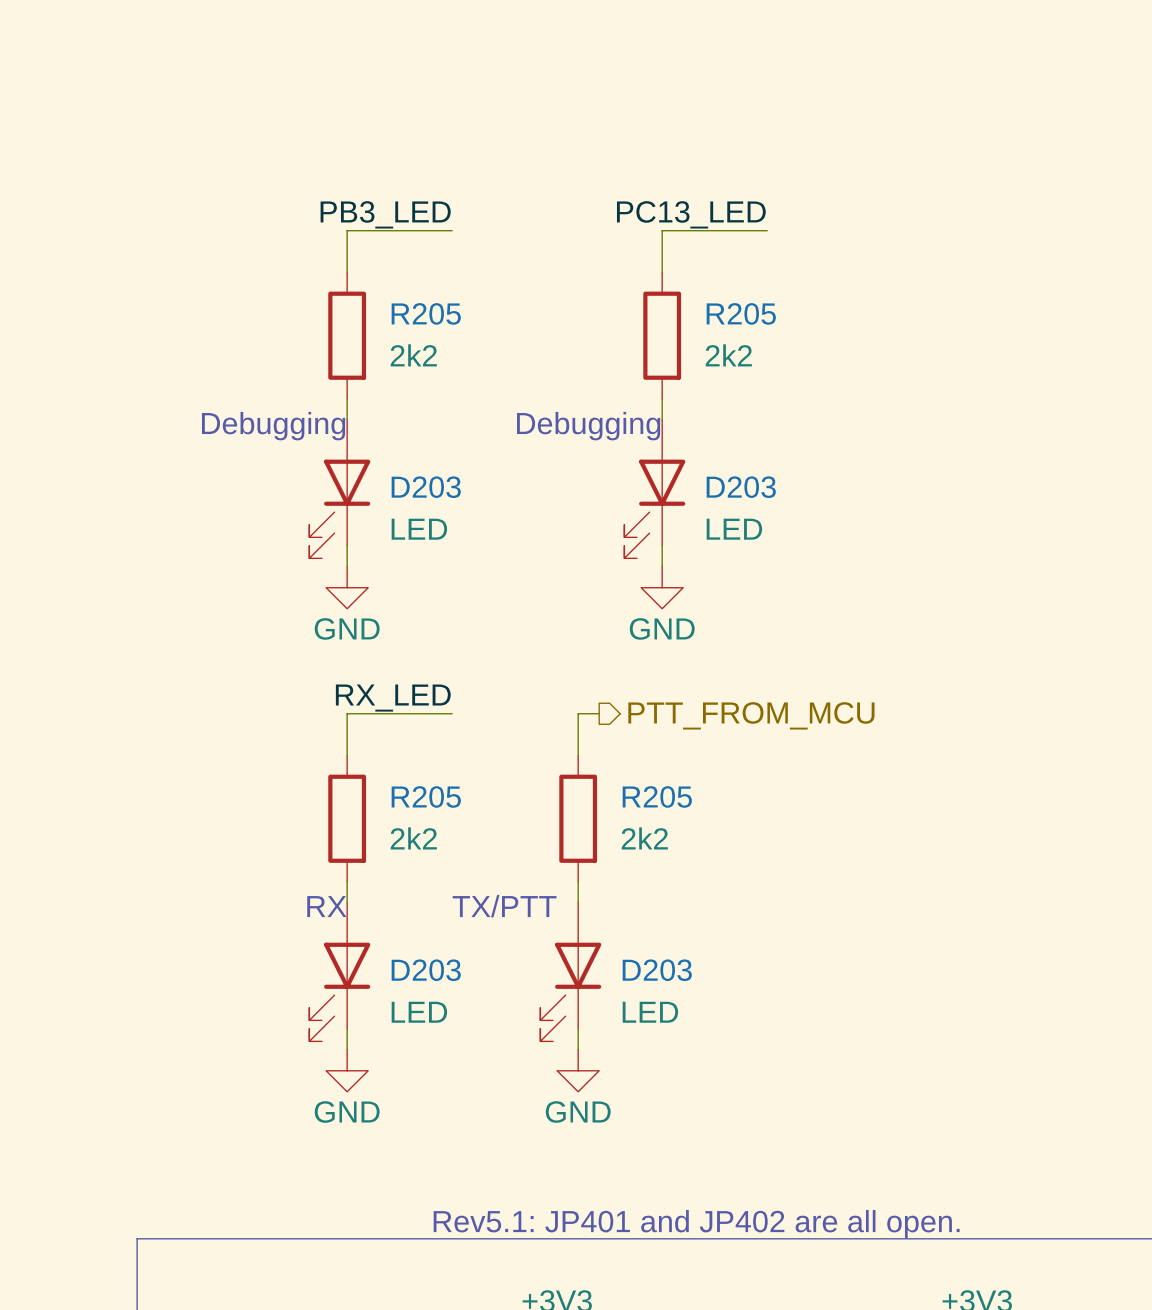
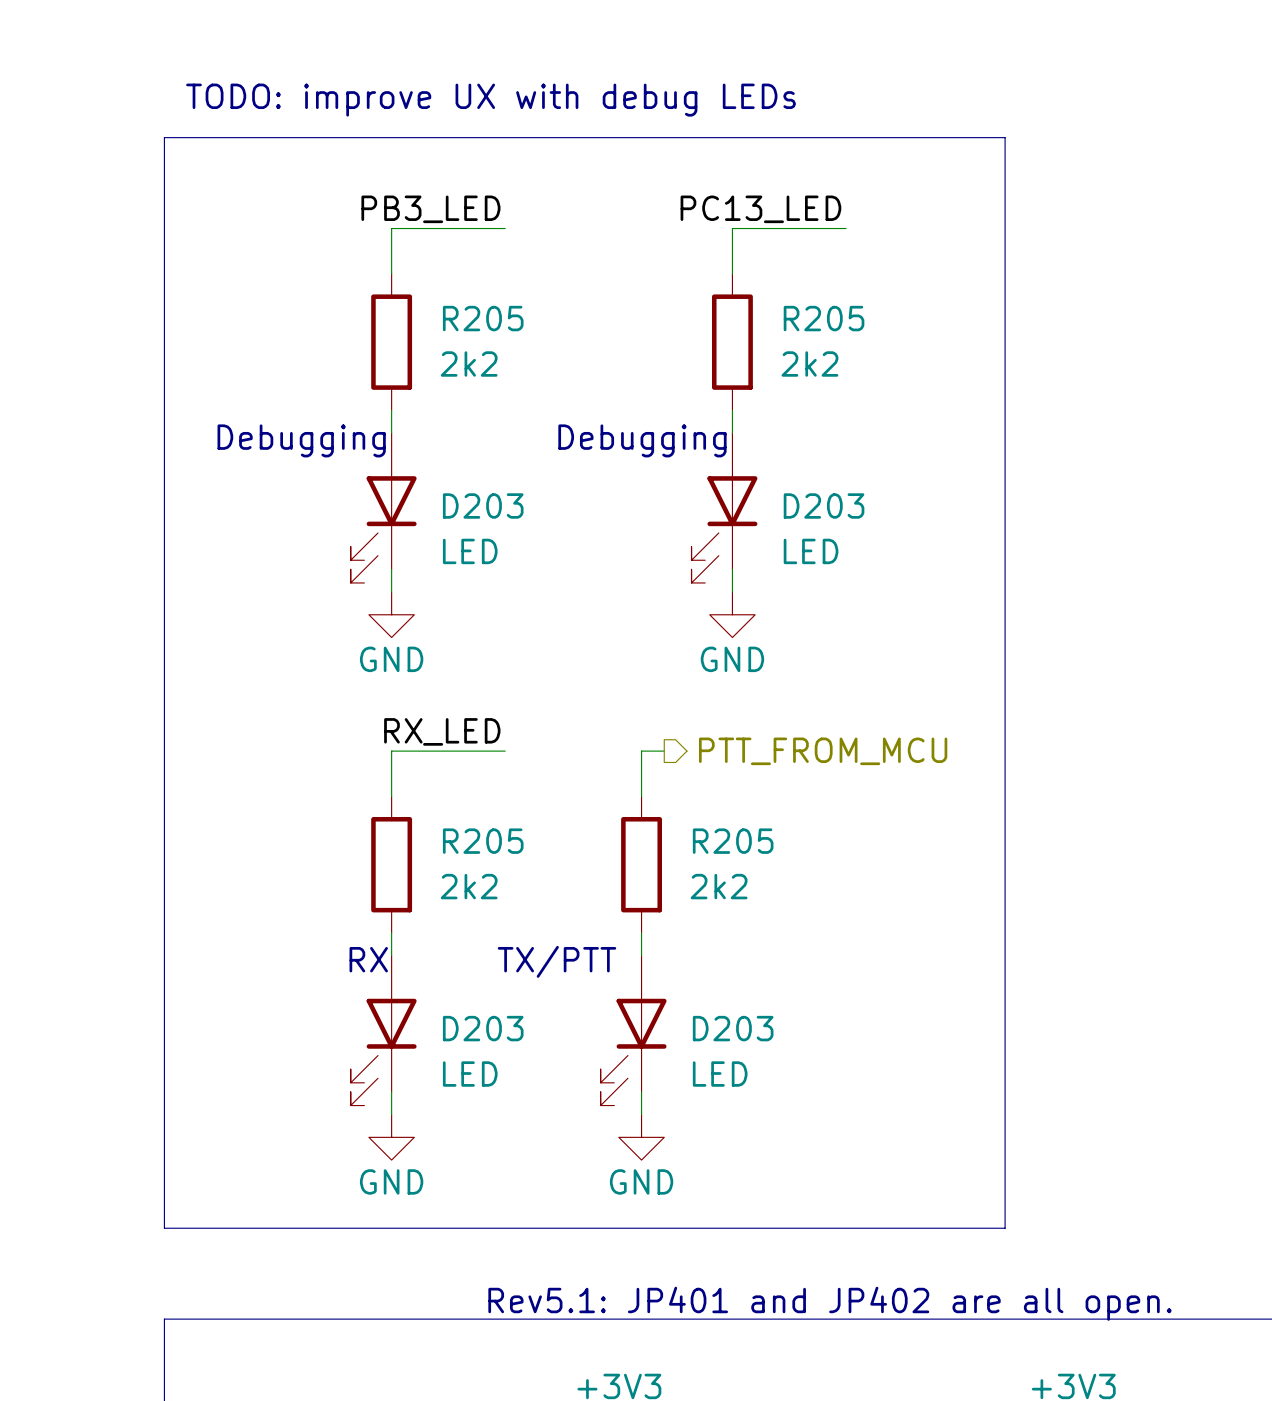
text: none -> TODO: improve UX with debug LEDs (490, 100)
line: none -> (164, 137) (1005, 137) (1005, 1228) (164, 1228) (164, 137)

